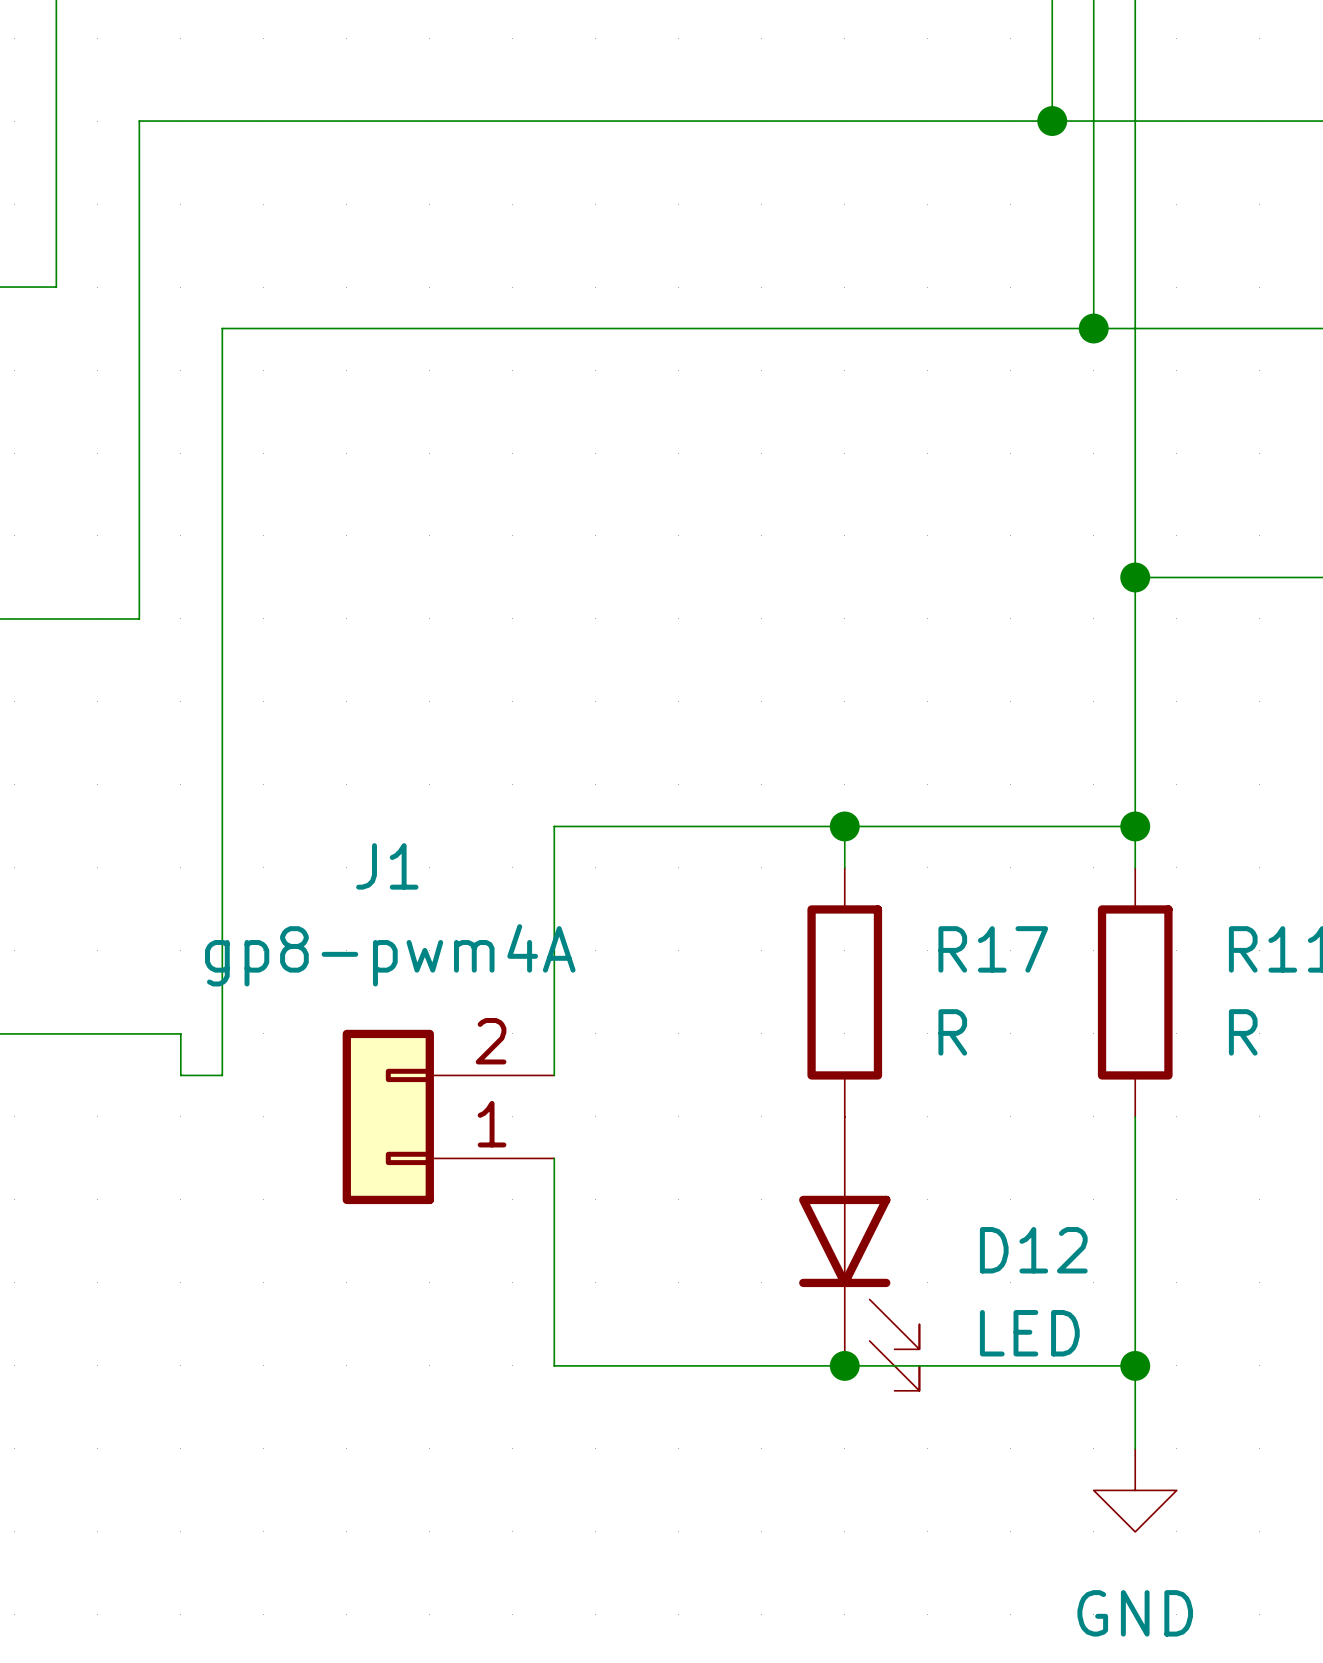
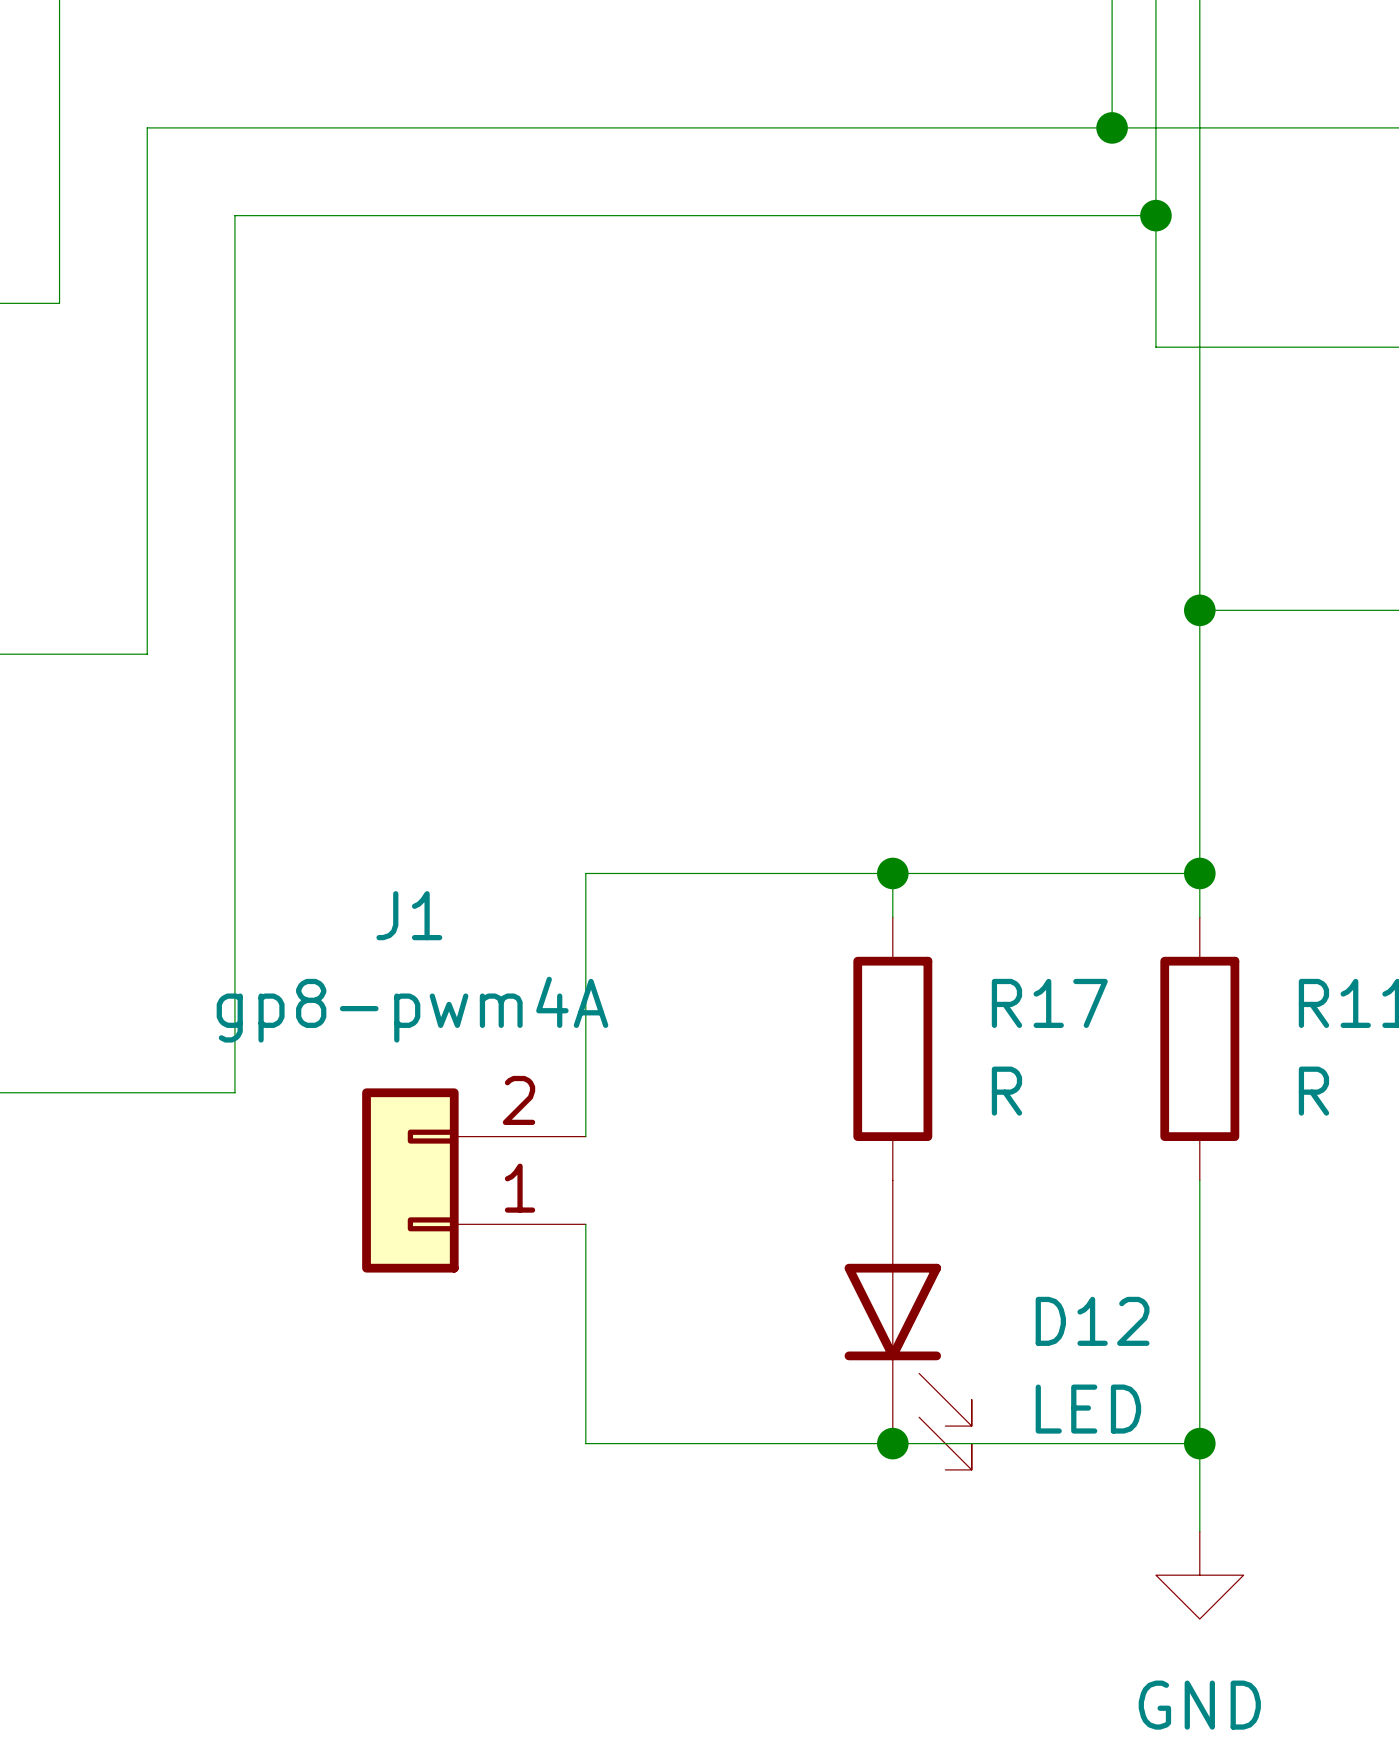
wire: (222, 328) (1093, 328) -> (234, 347) (234, 215) (1155, 215)
junction position: (1093, 328) -> (1155, 215)
wire: (180, 1033) (180, 1075) (222, 1075) (222, 1033) -> (191, 1092) (234, 1092)

